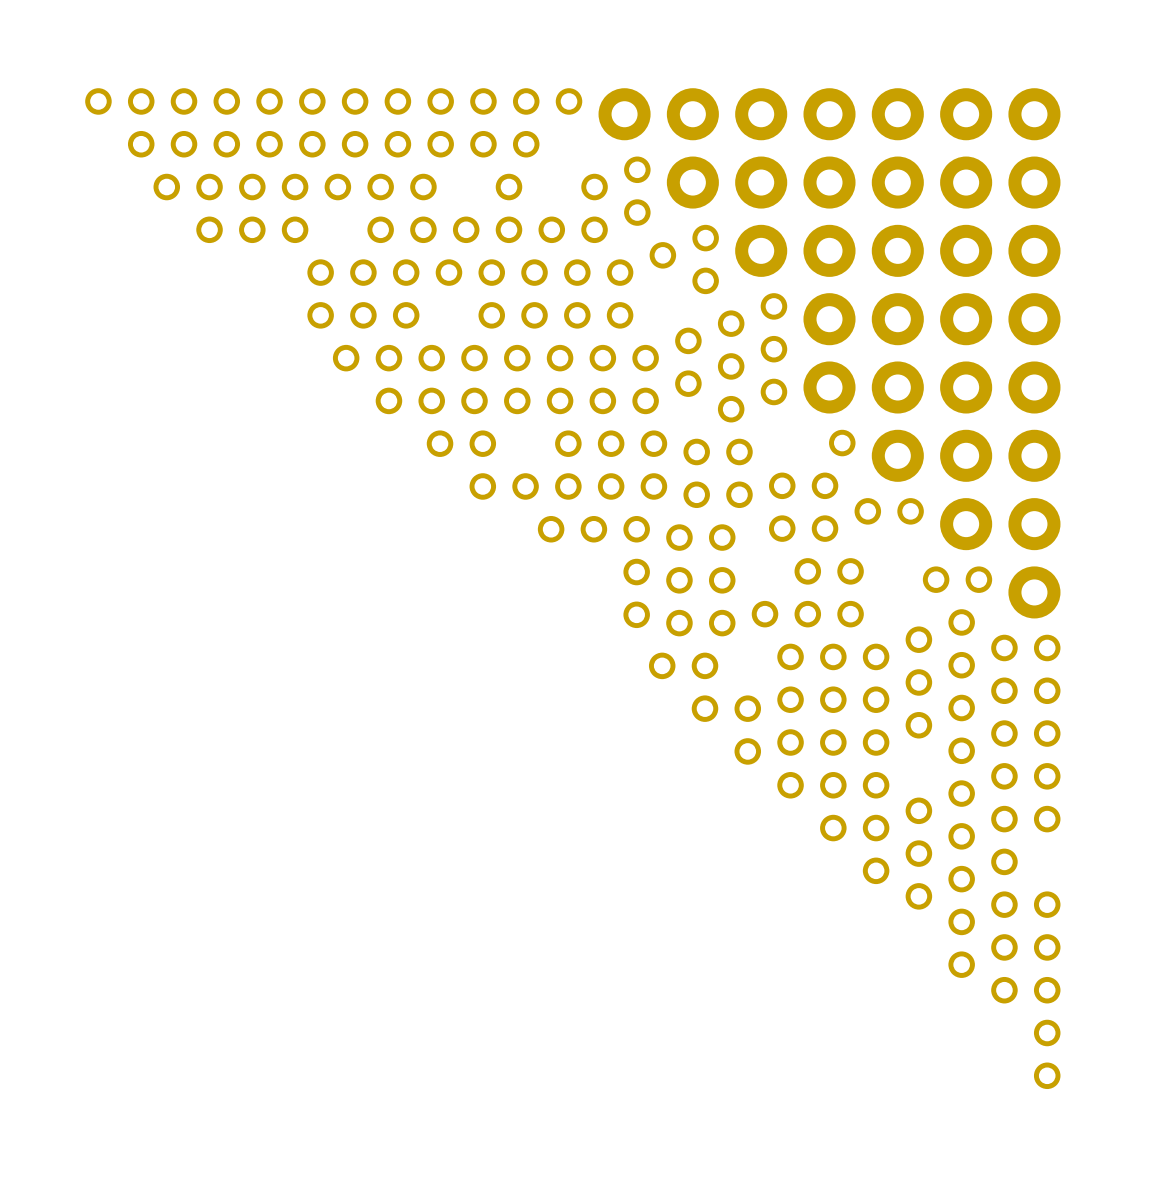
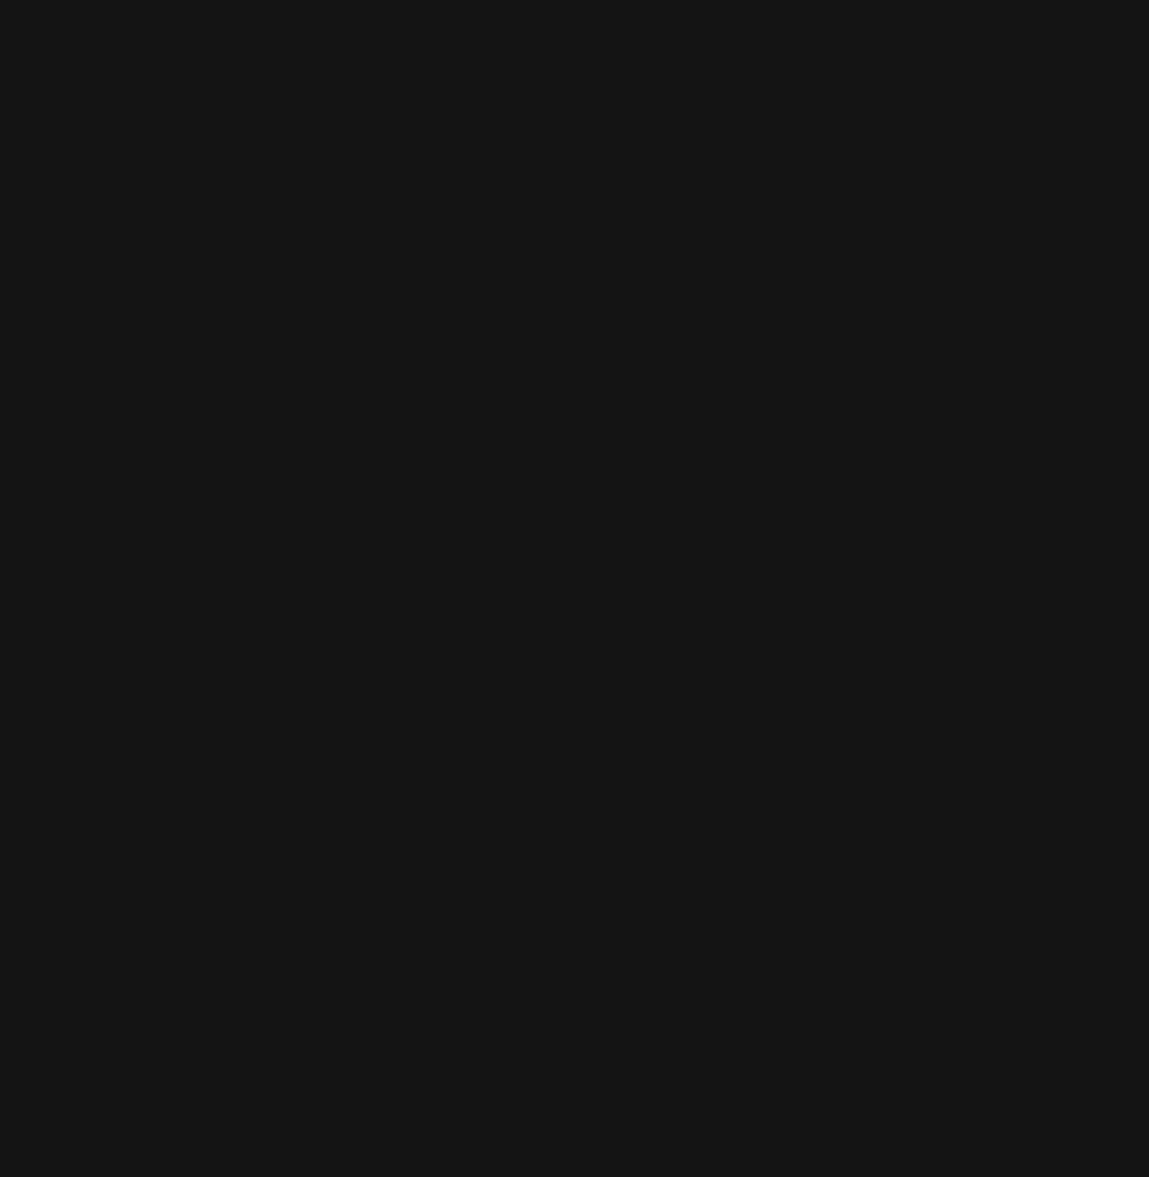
part: (98, 101) -> none
part: (141, 101) -> none
part: (184, 101) -> none
part: (226, 101) -> none
part: (269, 101) -> none
part: (312, 101) -> none
part: (355, 101) -> none
part: (397, 101) -> none
part: (440, 101) -> none
part: (483, 101) -> none
part: (526, 101) -> none
part: (569, 101) -> none
part: (624, 114) -> none
part: (692, 114) -> none
part: (761, 114) -> none
part: (829, 114) -> none
part: (897, 114) -> none
part: (966, 114) -> none
part: (1034, 114) -> none
part: (141, 144) -> none
part: (184, 144) -> none
part: (226, 144) -> none
part: (269, 144) -> none
part: (312, 144) -> none
part: (355, 144) -> none
part: (397, 144) -> none
part: (440, 144) -> none
part: (483, 144) -> none
part: (526, 144) -> none
part: (637, 169) -> none
part: (692, 182) -> none
part: (761, 182) -> none
part: (829, 182) -> none
part: (897, 182) -> none
part: (966, 182) -> none
part: (1034, 182) -> none
part: (166, 187) -> none
part: (209, 187) -> none
part: (252, 187) -> none
part: (295, 187) -> none
part: (337, 187) -> none
part: (380, 187) -> none
part: (423, 187) -> none
part: (508, 187) -> none
part: (594, 187) -> none
part: (637, 212) -> none
part: (209, 229) -> none
part: (252, 229) -> none
part: (295, 229) -> none
part: (380, 229) -> none
part: (423, 229) -> none
part: (466, 229) -> none
part: (508, 229) -> none
part: (551, 229) -> none
part: (594, 229) -> none
part: (705, 238) -> none
part: (761, 250) -> none
part: (829, 250) -> none
part: (897, 250) -> none
part: (966, 250) -> none
part: (1034, 250) -> none
part: (662, 255) -> none
part: (320, 272) -> none
part: (363, 272) -> none
part: (406, 272) -> none
part: (448, 272) -> none
part: (491, 272) -> none
part: (534, 272) -> none
part: (577, 272) -> none
part: (620, 272) -> none
part: (705, 280) -> none
part: (773, 306) -> none
part: (320, 315) -> none
part: (363, 315) -> none
part: (406, 315) -> none
part: (491, 315) -> none
part: (534, 315) -> none
part: (577, 315) -> none
part: (620, 315) -> none
part: (829, 319) -> none
part: (897, 319) -> none
part: (966, 319) -> none
part: (1034, 319) -> none
part: (731, 323) -> none
part: (688, 340) -> none
part: (773, 349) -> none
part: (346, 358) -> none
part: (388, 358) -> none
part: (431, 358) -> none
part: (474, 358) -> none
part: (517, 358) -> none
part: (560, 358) -> none
part: (602, 358) -> none
part: (645, 358) -> none
part: (731, 366) -> none
part: (688, 383) -> none
part: (829, 387) -> none
part: (897, 387) -> none
part: (966, 387) -> none
part: (1034, 387) -> none
part: (773, 391) -> none
part: (388, 400) -> none
part: (431, 400) -> none
part: (474, 400) -> none
part: (517, 400) -> none
part: (560, 400) -> none
part: (602, 400) -> none
part: (645, 400) -> none
part: (731, 409) -> none
part: (440, 443) -> none
part: (482, 443) -> none
part: (568, 443) -> none
part: (611, 443) -> none
part: (653, 443) -> none
part: (842, 443) -> none
part: (696, 451) -> none
part: (739, 451) -> none
part: (897, 455) -> none
part: (966, 455) -> none
part: (1034, 455) -> none
part: (782, 485) -> none
part: (825, 485) -> none
part: (482, 486) -> none
part: (525, 486) -> none
part: (568, 486) -> none
part: (611, 486) -> none
part: (653, 486) -> none
part: (696, 494) -> none
part: (739, 494) -> none
part: (867, 511) -> none
part: (910, 511) -> none
part: (966, 524) -> none
part: (1034, 524) -> none
part: (782, 528) -> none
part: (825, 528) -> none
part: (551, 529) -> none
part: (593, 529) -> none
part: (636, 529) -> none
part: (679, 537) -> none
part: (722, 537) -> none
part: (807, 571) -> none
part: (850, 571) -> none
part: (636, 572) -> none
part: (936, 579) -> none
part: (978, 579) -> none
part: (679, 580) -> none
part: (722, 580) -> none
part: (1034, 592) -> none
part: (636, 614) -> none
part: (765, 614) -> none
part: (807, 614) -> none
part: (850, 614) -> none
part: (961, 622) -> none
part: (679, 623) -> none
part: (722, 623) -> none
part: (918, 639) -> none
part: (1004, 647) -> none
part: (1047, 647) -> none
part: (790, 656) -> none
part: (833, 656) -> none
part: (876, 656) -> none
part: (662, 665) -> none
part: (704, 665) -> none
part: (961, 665) -> none
part: (918, 682) -> none
part: (1004, 690) -> none
part: (1047, 690) -> none
part: (790, 699) -> none
part: (833, 699) -> none
part: (876, 699) -> none
part: (704, 708) -> none
part: (747, 708) -> none
part: (961, 708) -> none
part: (918, 725) -> none
part: (1004, 733) -> none
part: (1047, 733) -> none
part: (790, 742) -> none
part: (833, 742) -> none
part: (876, 742) -> none
part: (961, 750) -> none
part: (747, 751) -> none
part: (1004, 776) -> none
part: (1047, 776) -> none
part: (790, 785) -> none
part: (833, 785) -> none
part: (876, 785) -> none
part: (961, 793) -> none
part: (918, 810) -> none
part: (1004, 819) -> none
part: (1047, 819) -> none
part: (833, 828) -> none
part: (876, 828) -> none
part: (961, 836) -> none
part: (918, 853) -> none
part: (1004, 861) -> none
part: (876, 870) -> none
part: (961, 879) -> none
part: (918, 896) -> none
part: (1004, 904) -> none
part: (1047, 904) -> none
part: (961, 921) -> none
part: (1004, 947) -> none
part: (1047, 947) -> none
part: (961, 964) -> none
part: (1004, 990) -> none
part: (1047, 990) -> none
part: (1047, 1032) -> none
part: (1047, 1075) -> none

